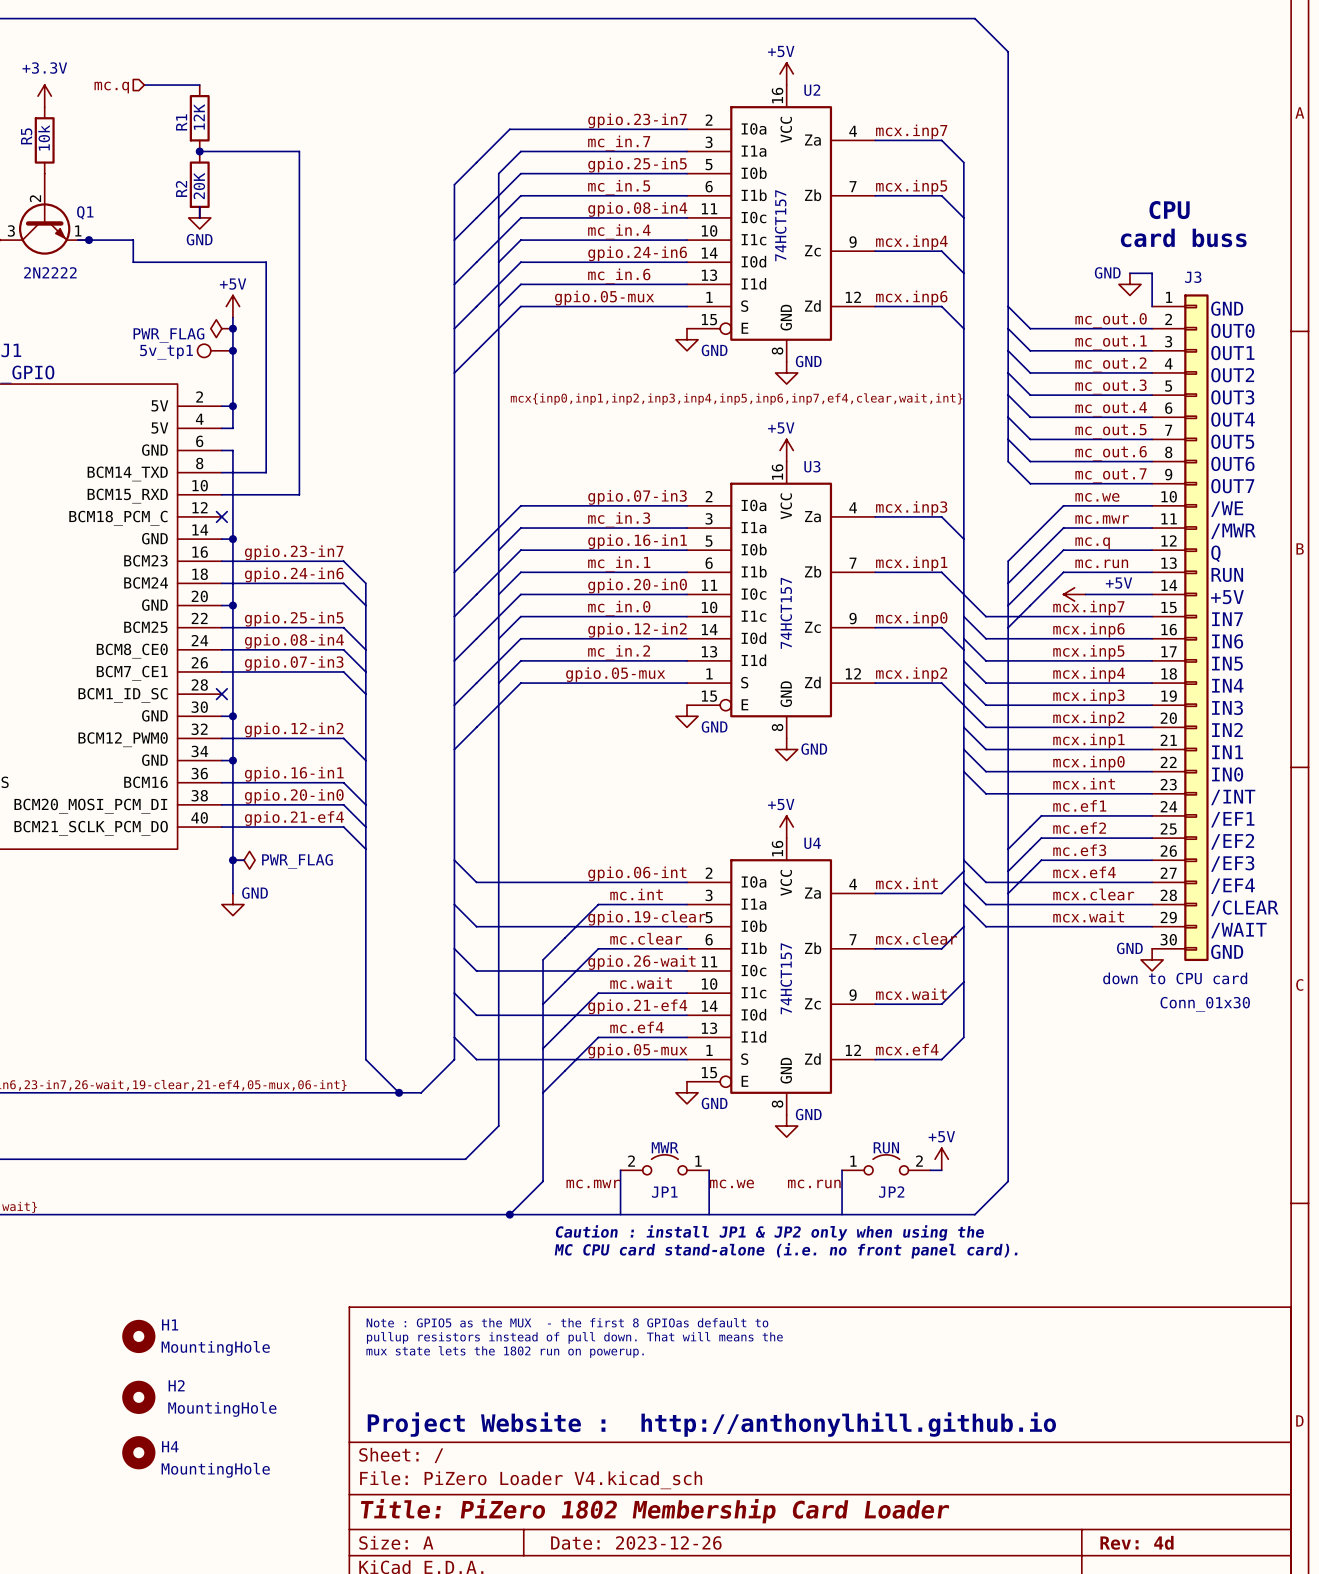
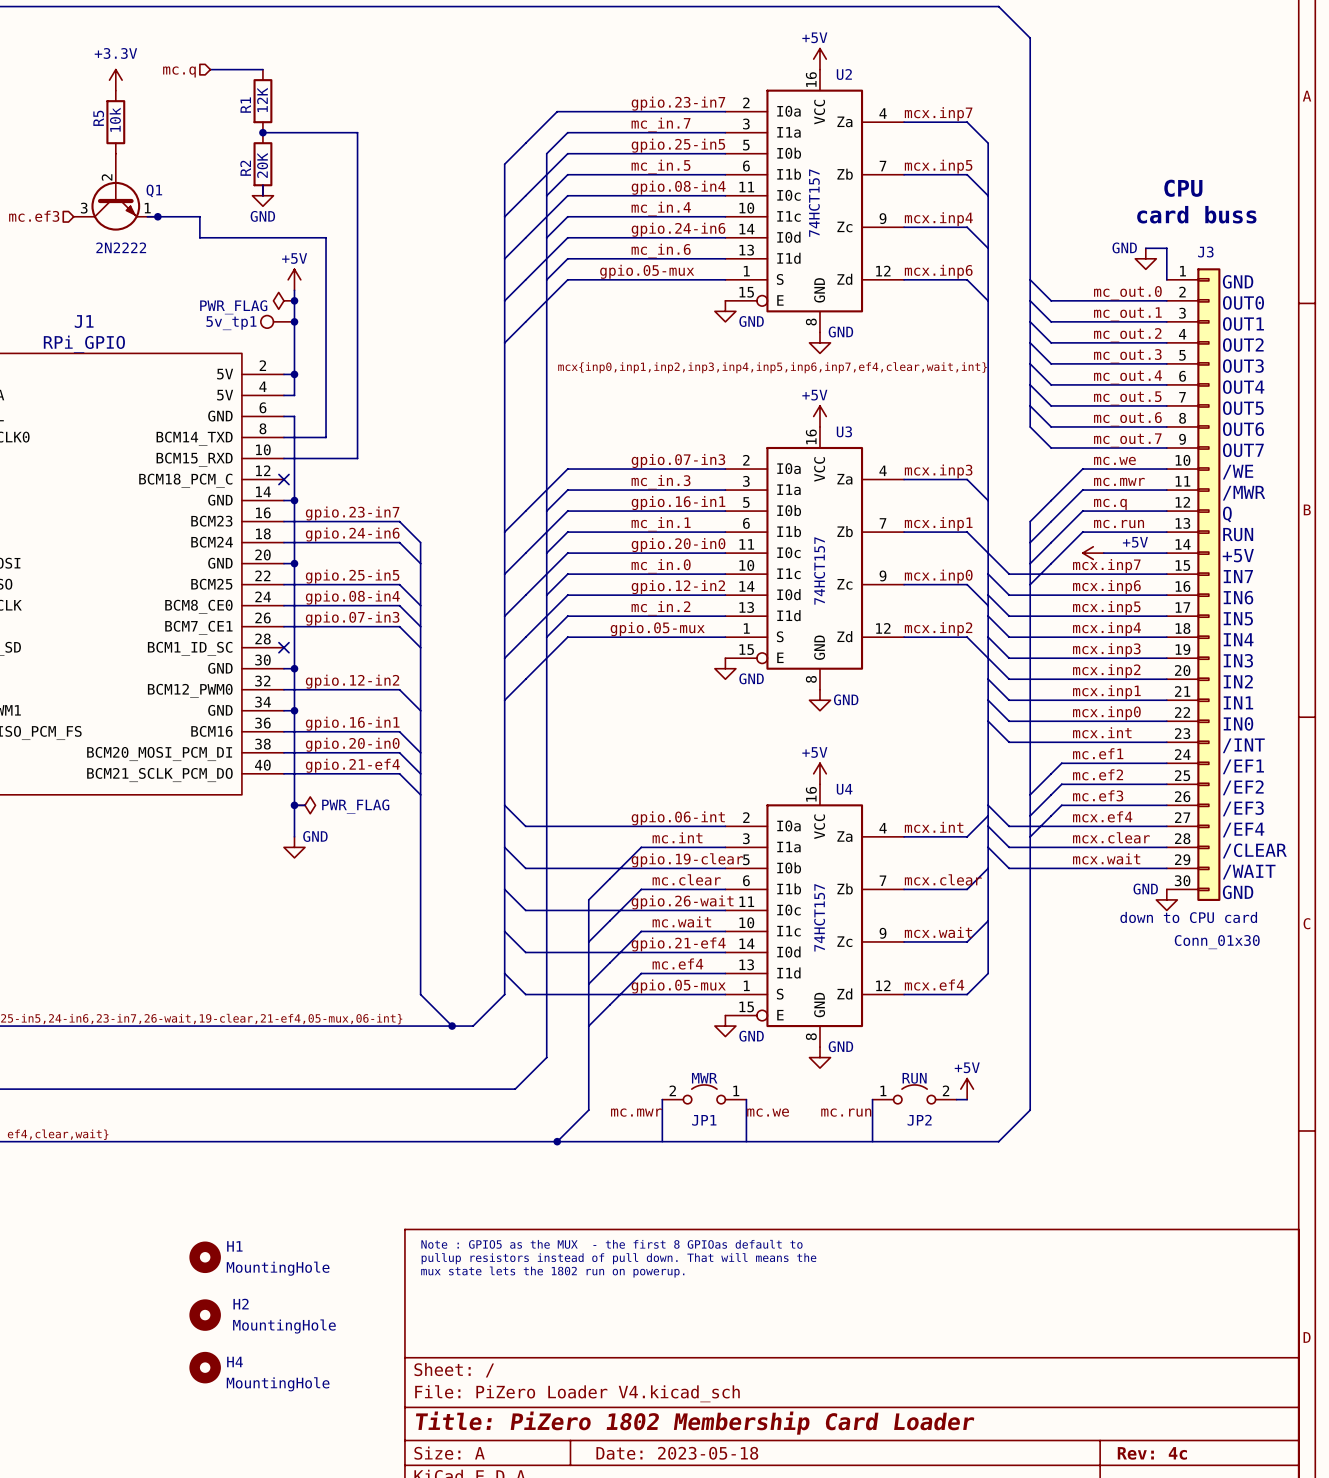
text: Caution : install JP1 & JP2 only when using the (769, 1232) -> none
text: MC CPU card stand-alone (i.e. no front panel card). (786, 1250) -> none
text: Project Website : http://anthonylhill.github.io (711, 1424) -> none
title block: Date: 2023-12-26 (636, 1542) -> Date: 2023-05-18 (677, 1453)
title block: Rev: 4d (1137, 1542) -> Rev: 4c (1152, 1453)

